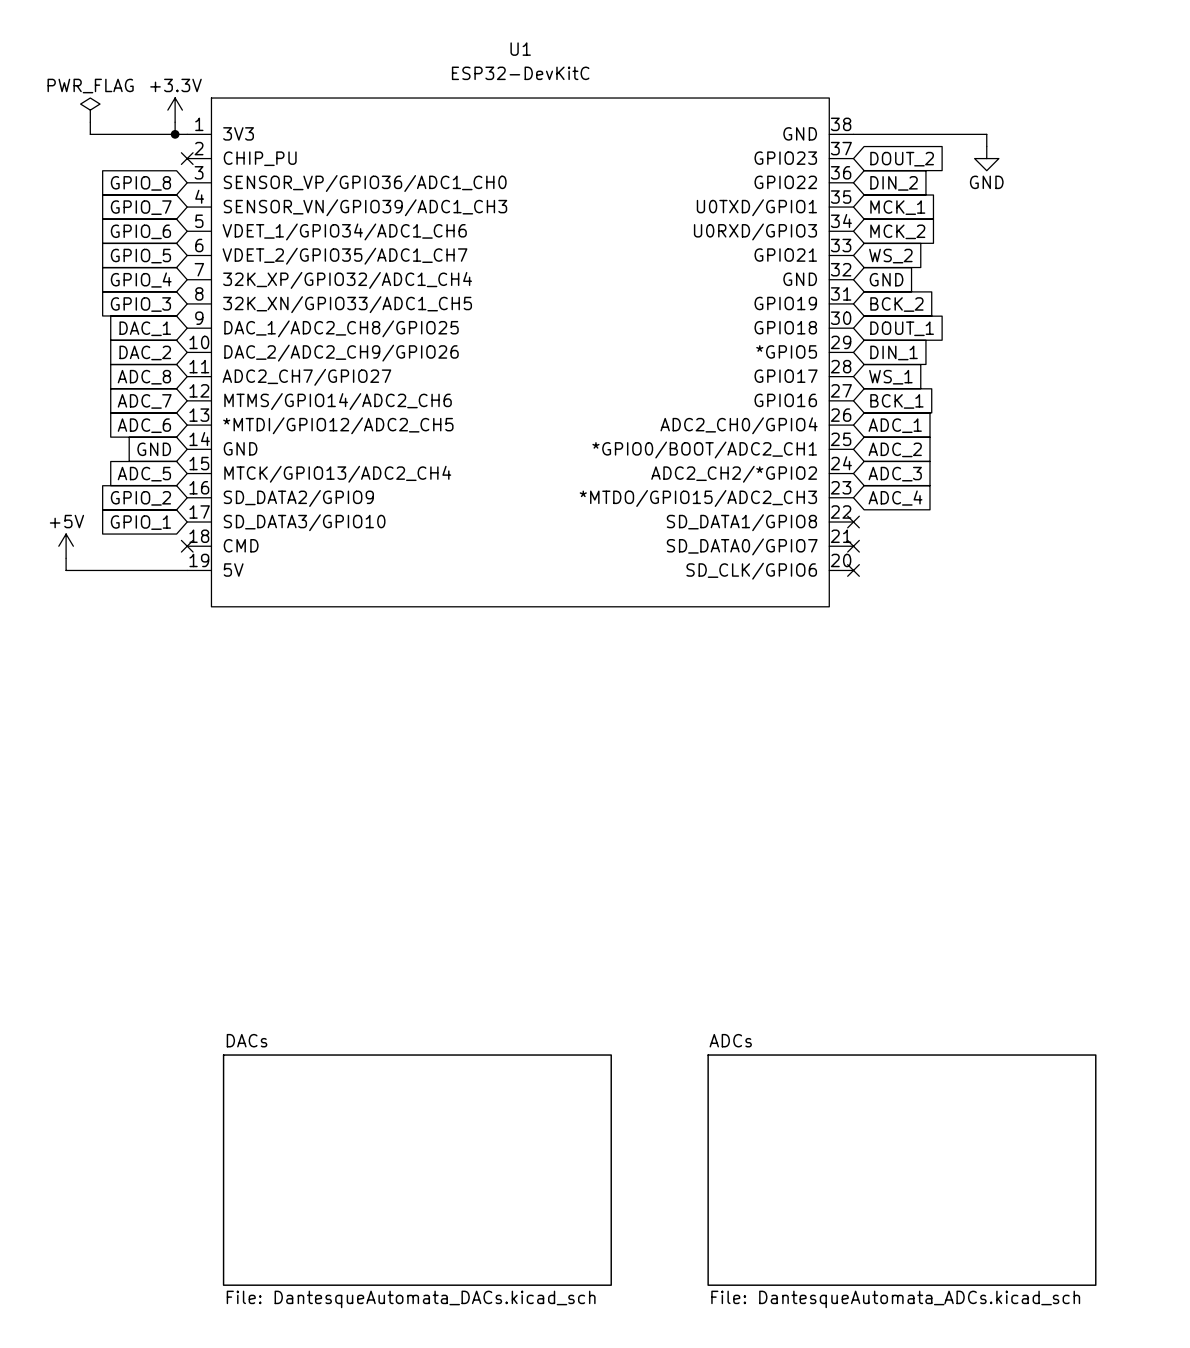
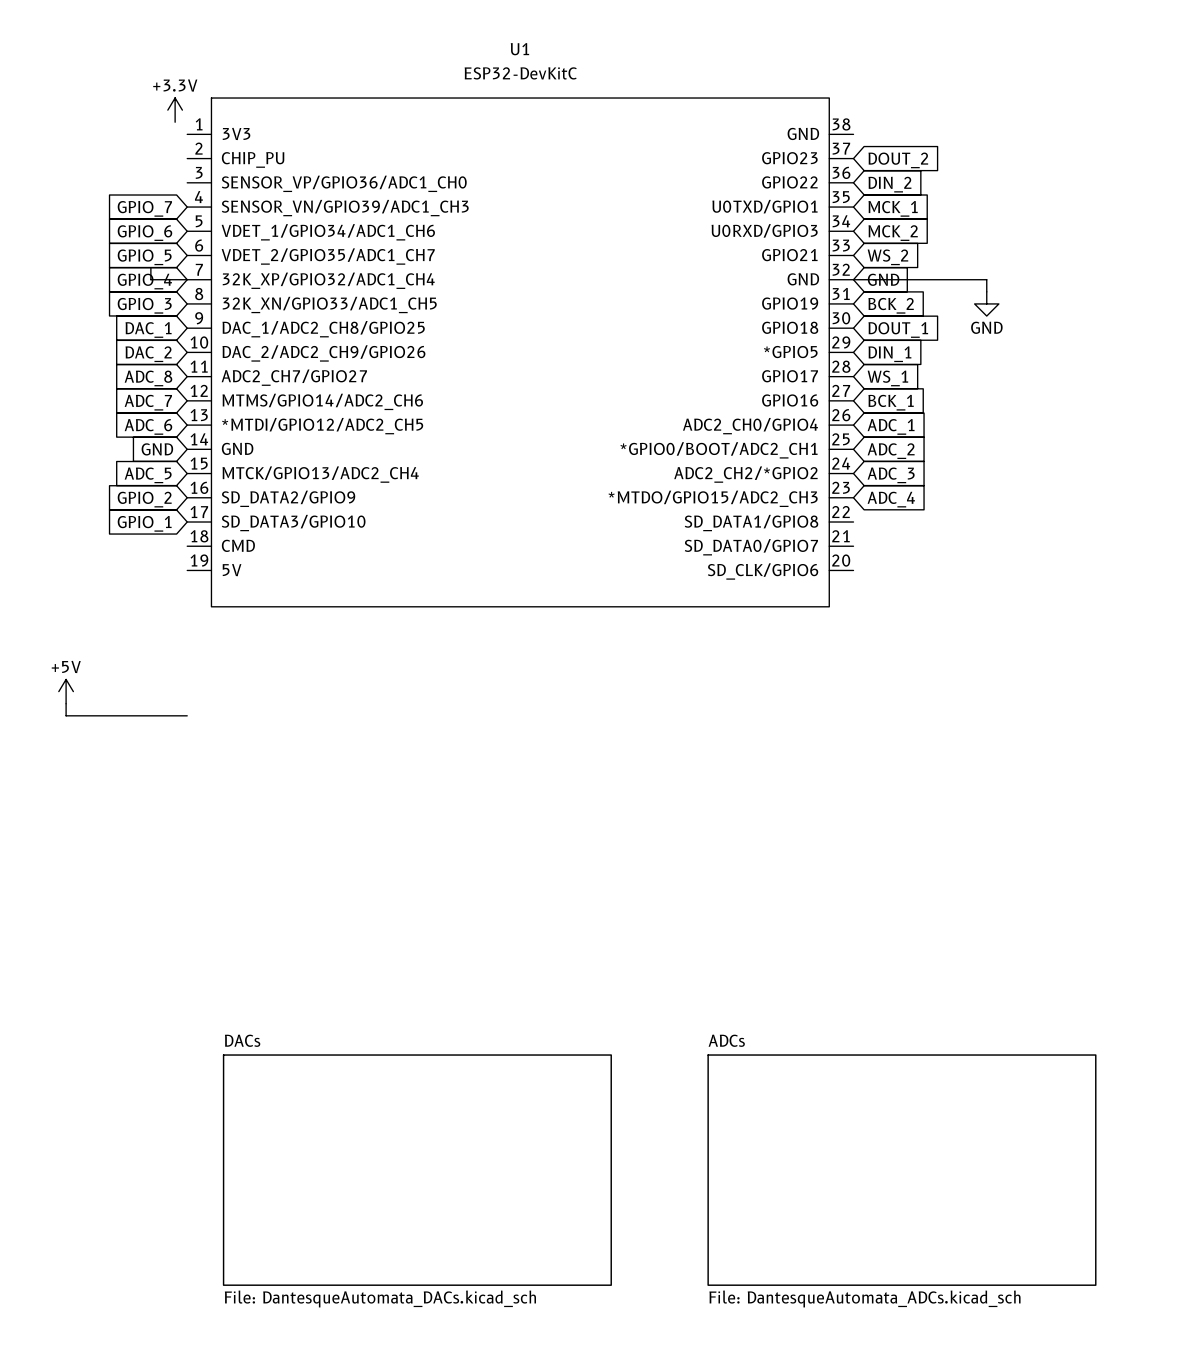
power symbol: PWR_FLAG (90, 110) -> none
wire: (90, 122) (90, 134) (187, 134) -> none
wire: (175, 122) (175, 134) -> none
junction: (175, 134) -> none
wire: (853, 134) (986, 134) (986, 146) -> (853, 279) (986, 279) (986, 291)
no-connect mark: (187, 158) -> none
power symbol position: GND (986, 158) -> GND (986, 303)
global label: GPIO_8 (140, 183) -> none
wire: none -> (150, 267) (150, 279) (187, 279)
no-connect mark: (853, 522) -> none
power symbol position: +5V (66, 546) -> +5V (66, 691)
no-connect mark: (187, 546) -> none
no-connect mark: (853, 546) -> none
wire: (66, 558) (66, 570) (187, 570) -> (66, 703) (66, 715) (187, 715)
no-connect mark: (853, 570) -> none

